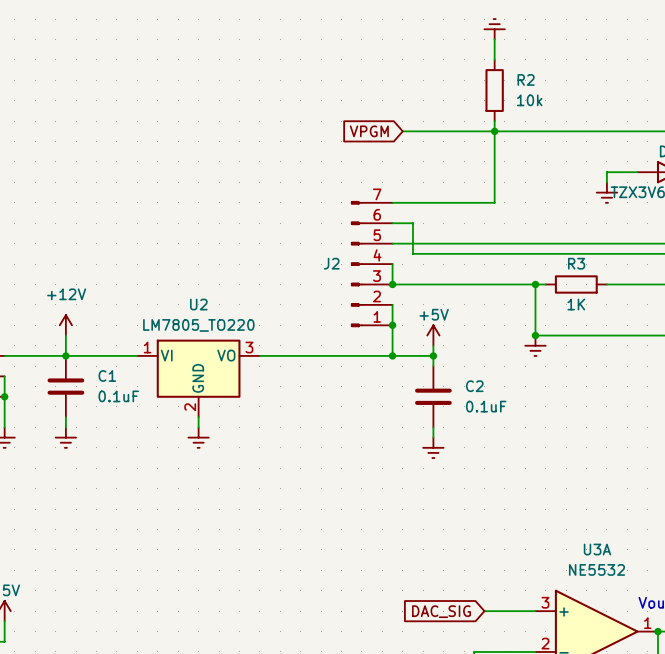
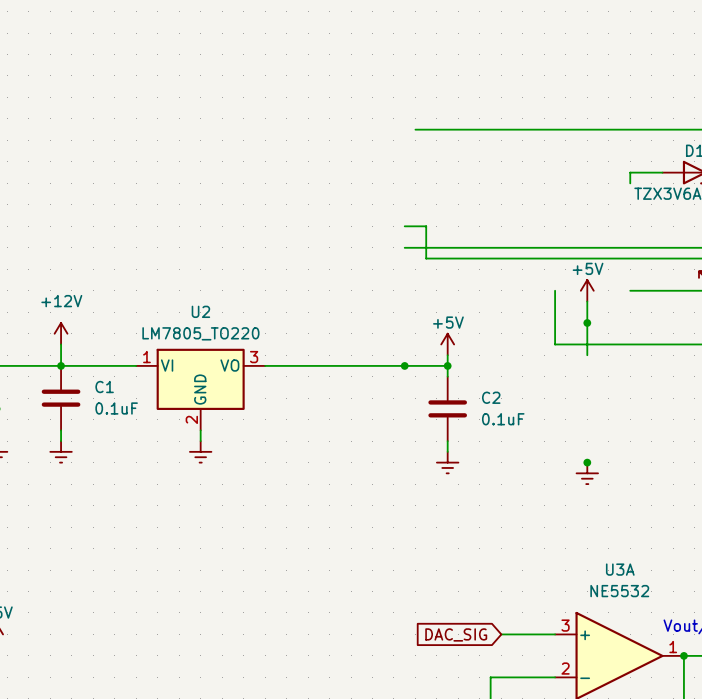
power symbol: (494, 29) -> none
wire: (494, 39) (494, 59) -> none
R2: 10k (494, 90) -> none
wire: (494, 121) (494, 202) (392, 202) -> none
global label: VPGM (369, 131) -> none
junction: (494, 131) -> none
power symbol: (606, 192) -> none
J2: (371, 264) -> none
wire: (392, 264) (392, 284) (545, 284) -> none
junction: (392, 284) -> none
junction: (535, 284) -> none
power symbol: none -> +5V (587, 290)
R3: 1K (576, 284) -> none
wire: (392, 304) (392, 355) -> (587, 301) (587, 355)
junction: none -> (587, 322)
junction: (392, 325) -> none
junction: (535, 335) -> none
power symbol position: (535, 345) -> (587, 473)
junction: none -> (587, 462)

